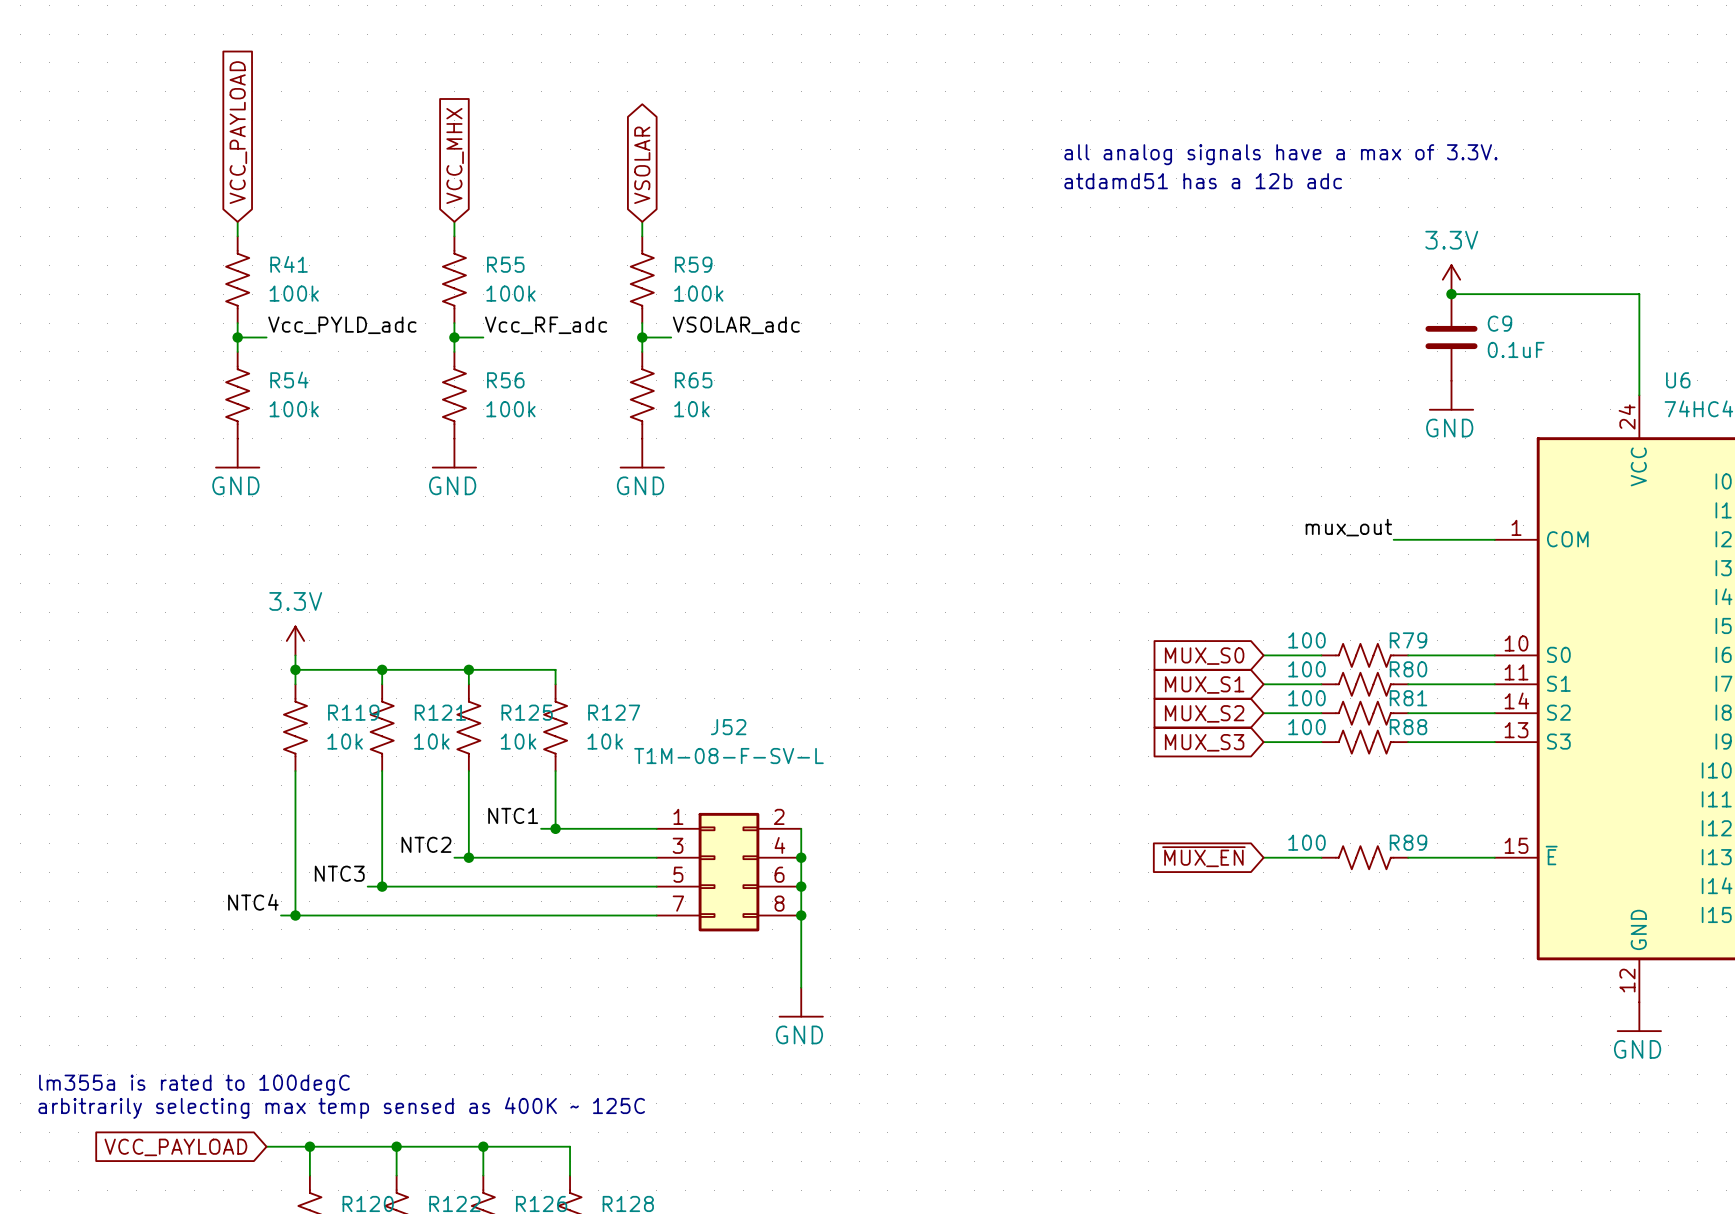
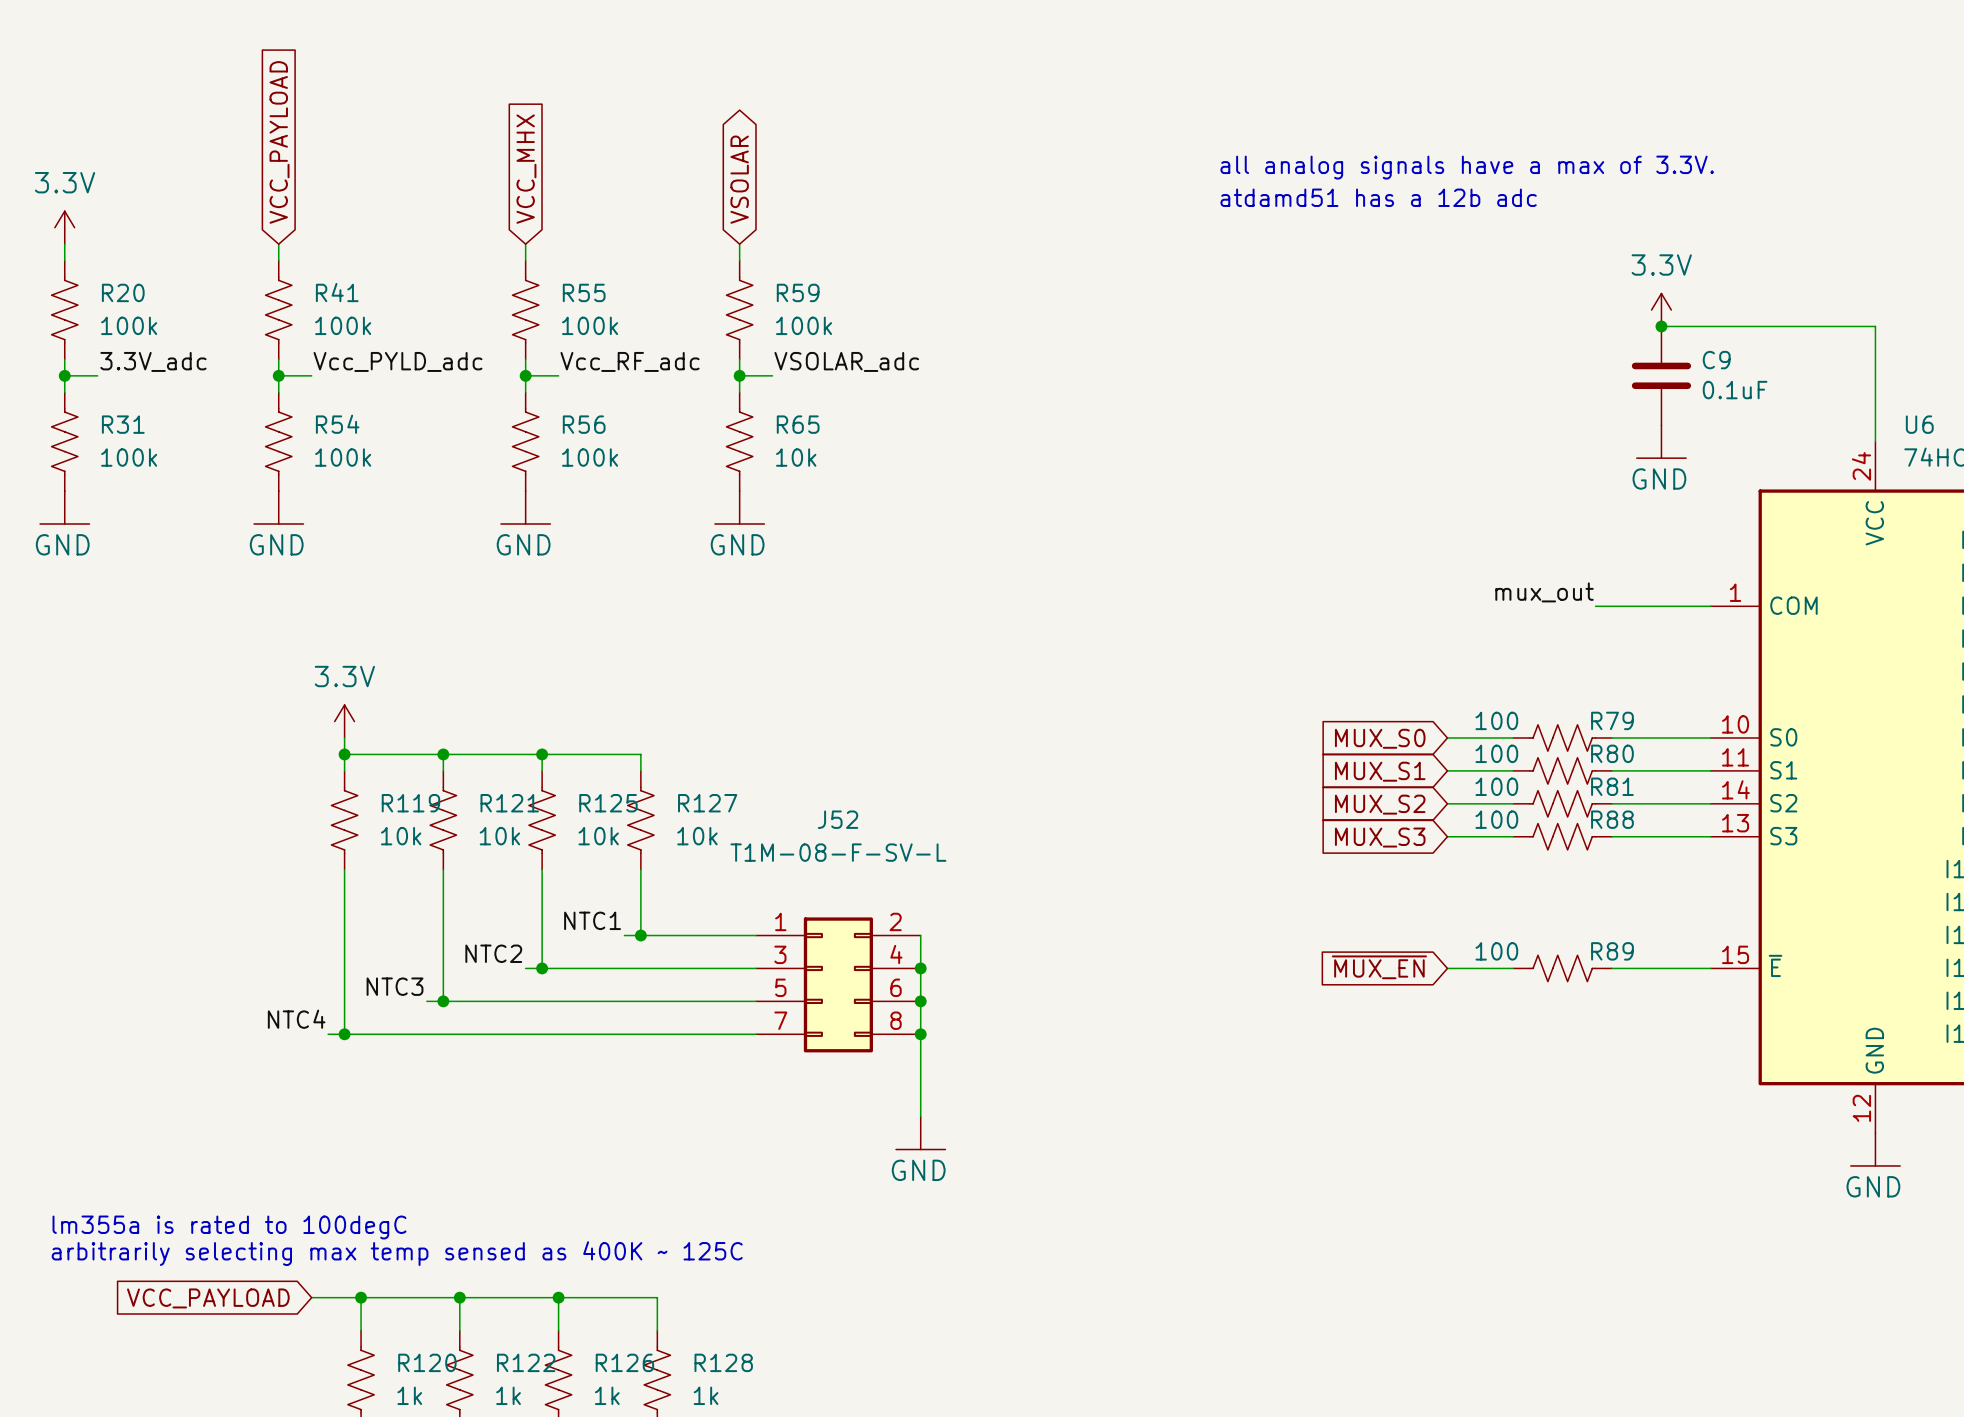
power symbol: none -> 3.3V (64, 227)
wire: none -> (64, 244) (64, 260)
R20: none -> 100k (64, 310)
wire: none -> (64, 359) (64, 392)
label: none -> 3.3V_adc (153, 361)
wire: none -> (64, 375) (97, 375)
junction: none -> (64, 375)
R31: none -> 100k (64, 441)
power symbol: none -> GND (64, 507)

